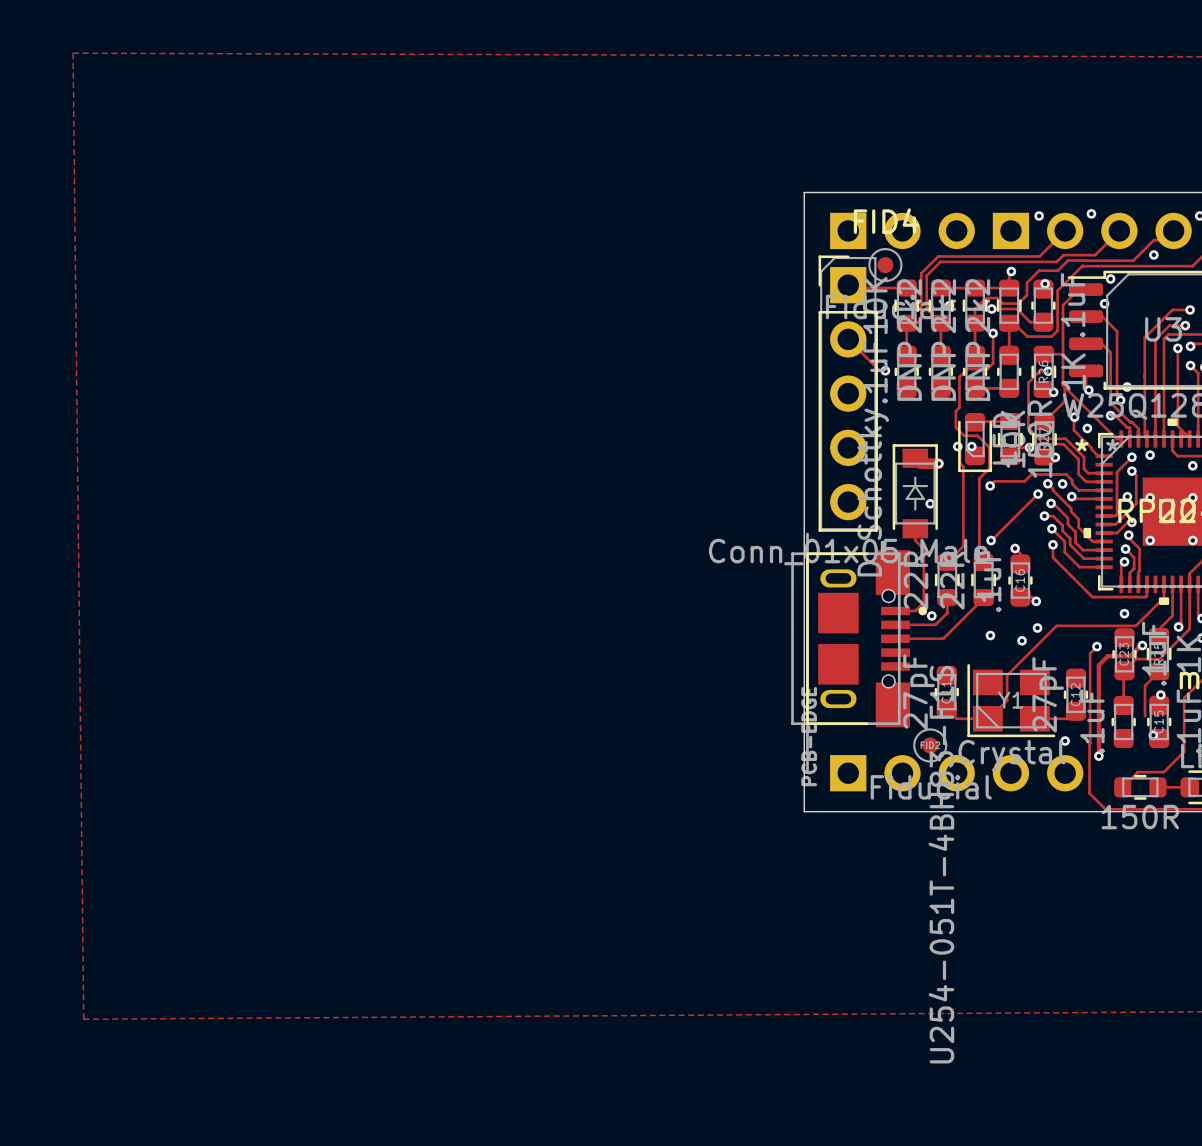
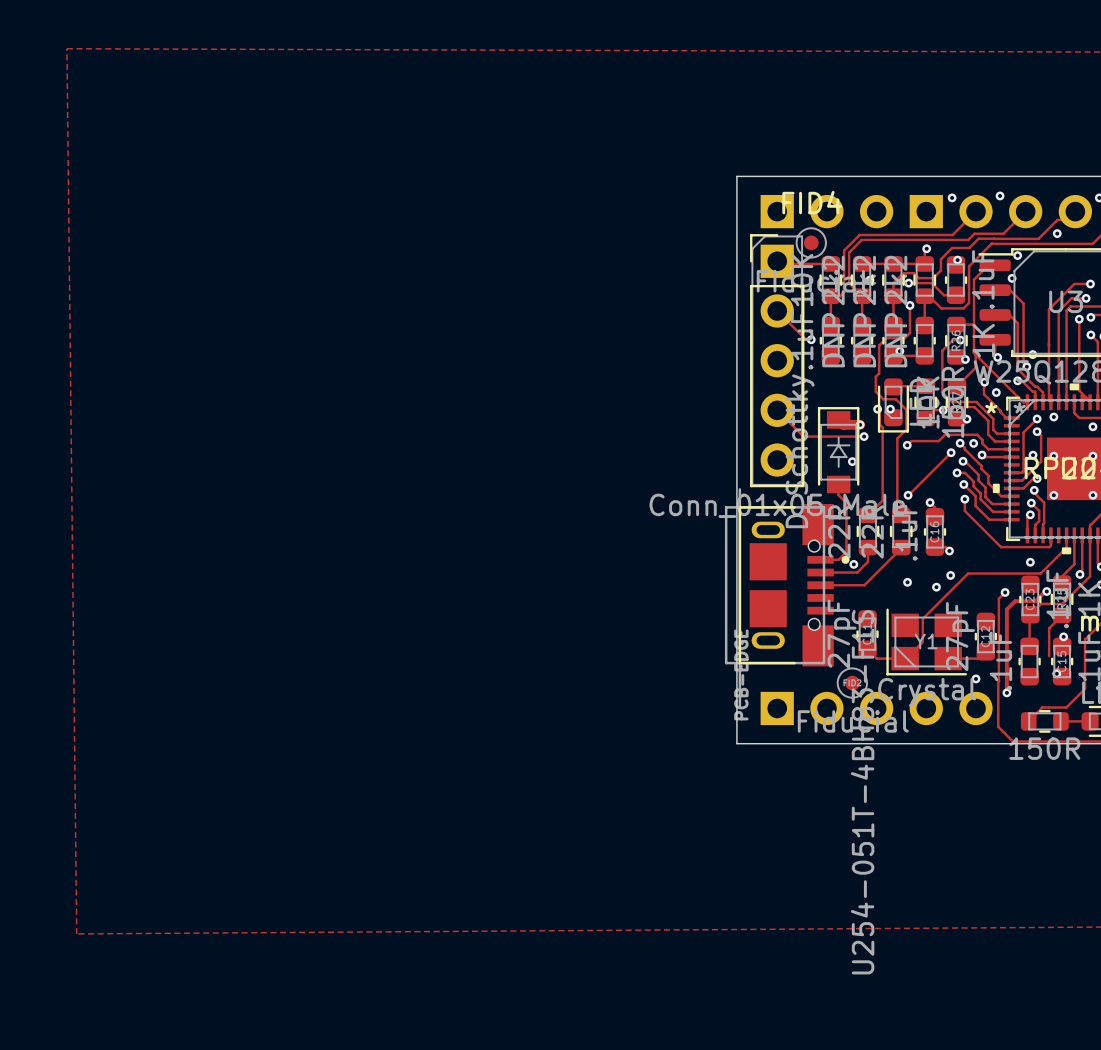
via: none -> (899, 351)
track: none -> (777, 410) (803, 436) (864, 436)
via: none -> (864, 436)

